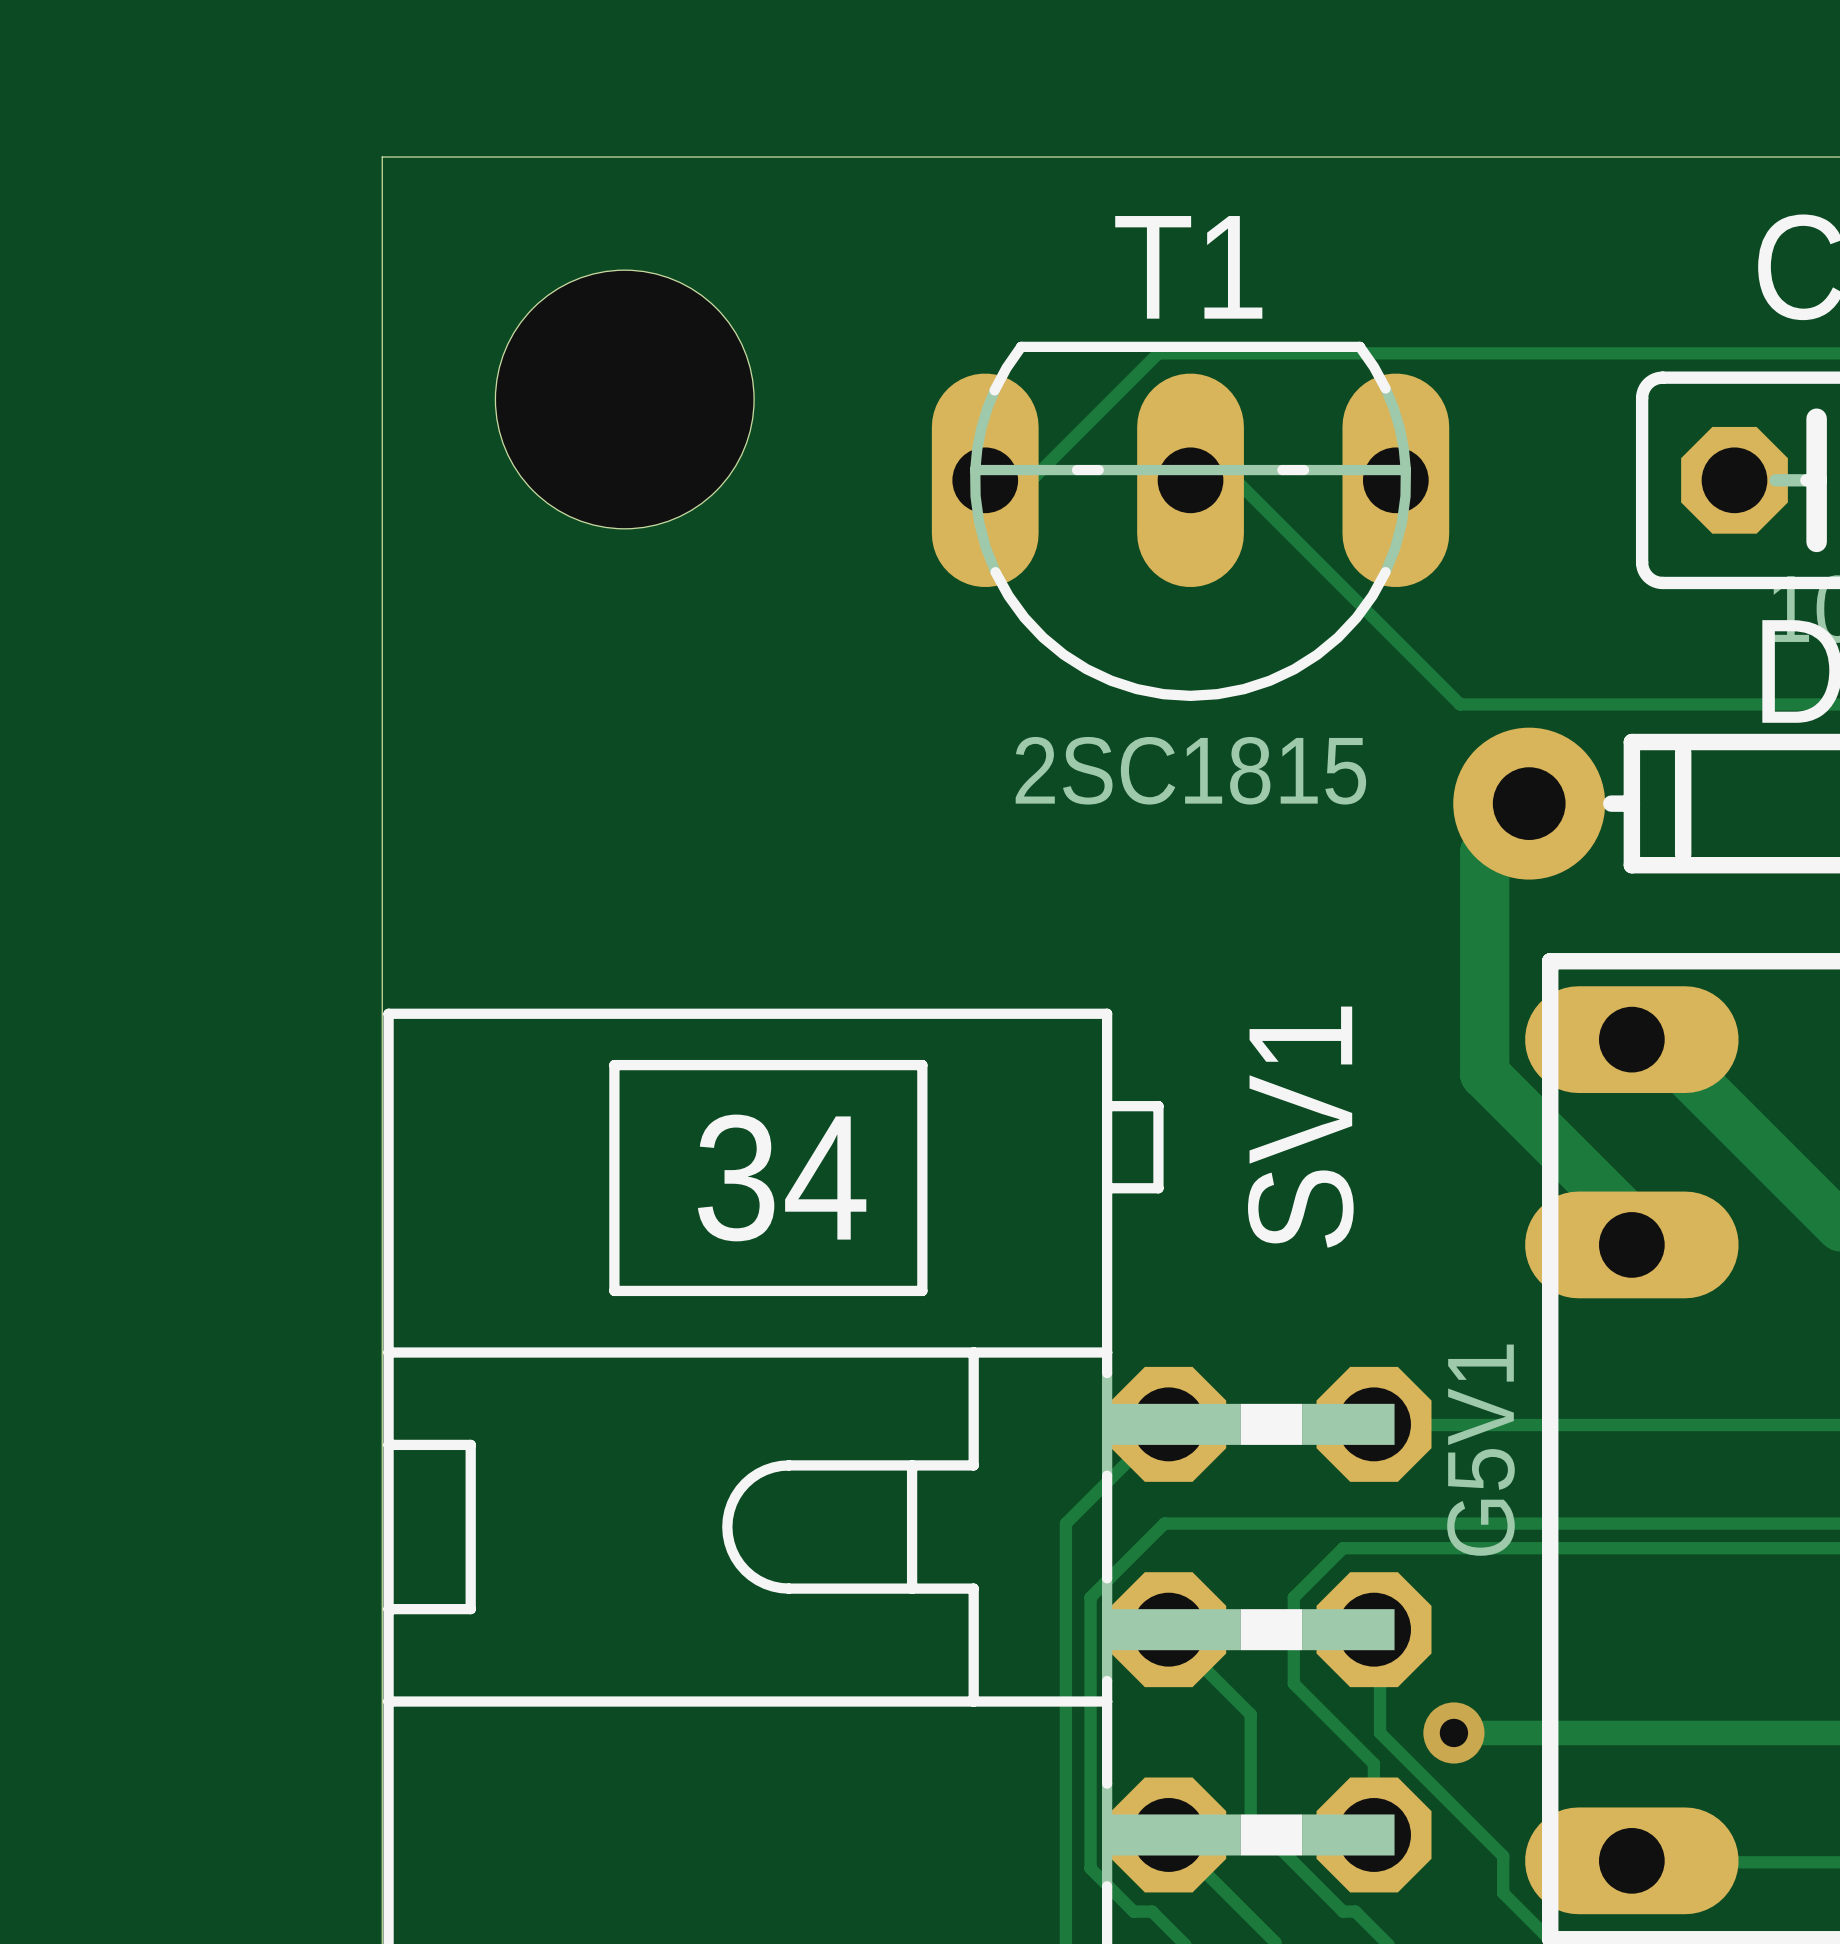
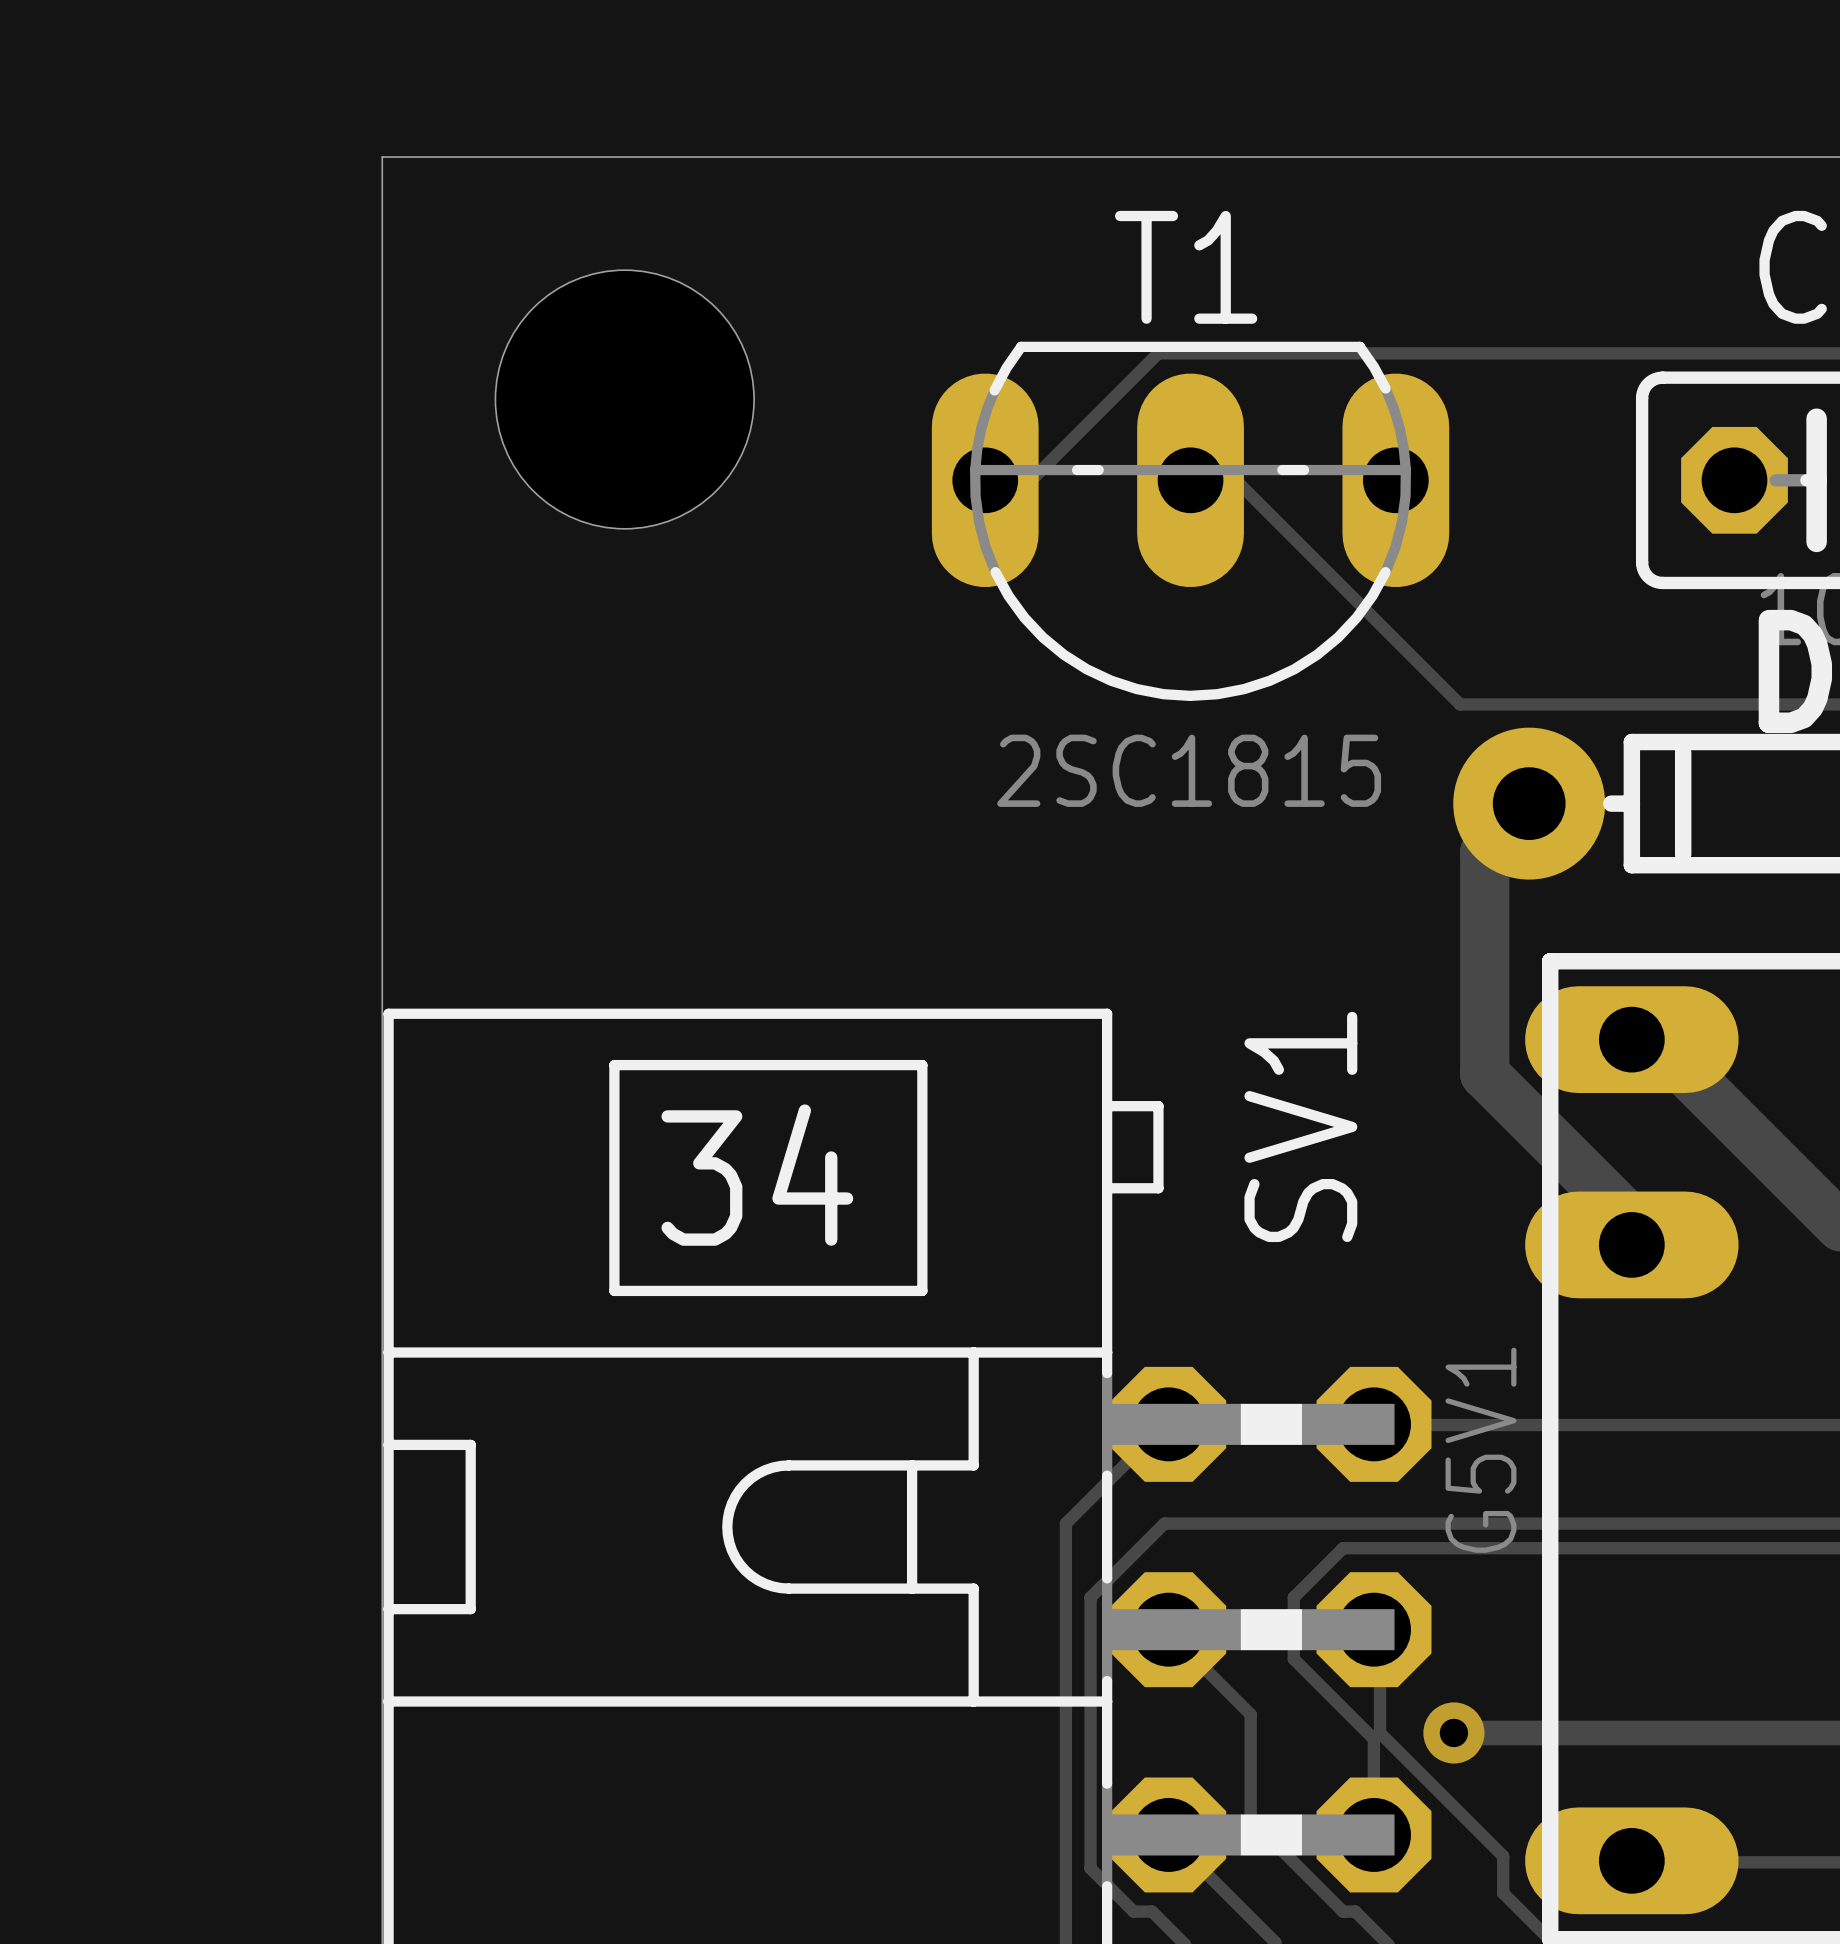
track: (1293, 1659) (1293, 1683) (1373, 1763) -> (1293, 1659) (1373, 1739) (1373, 1763)

